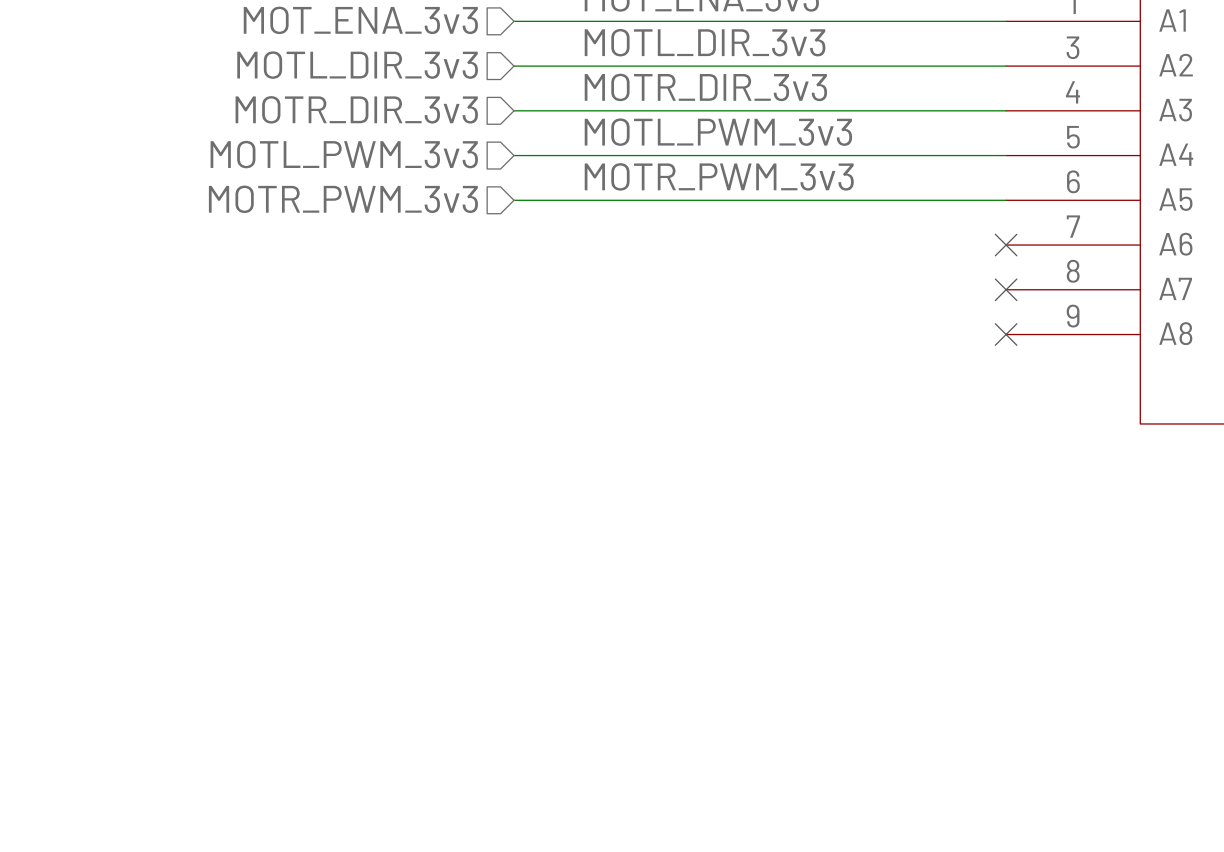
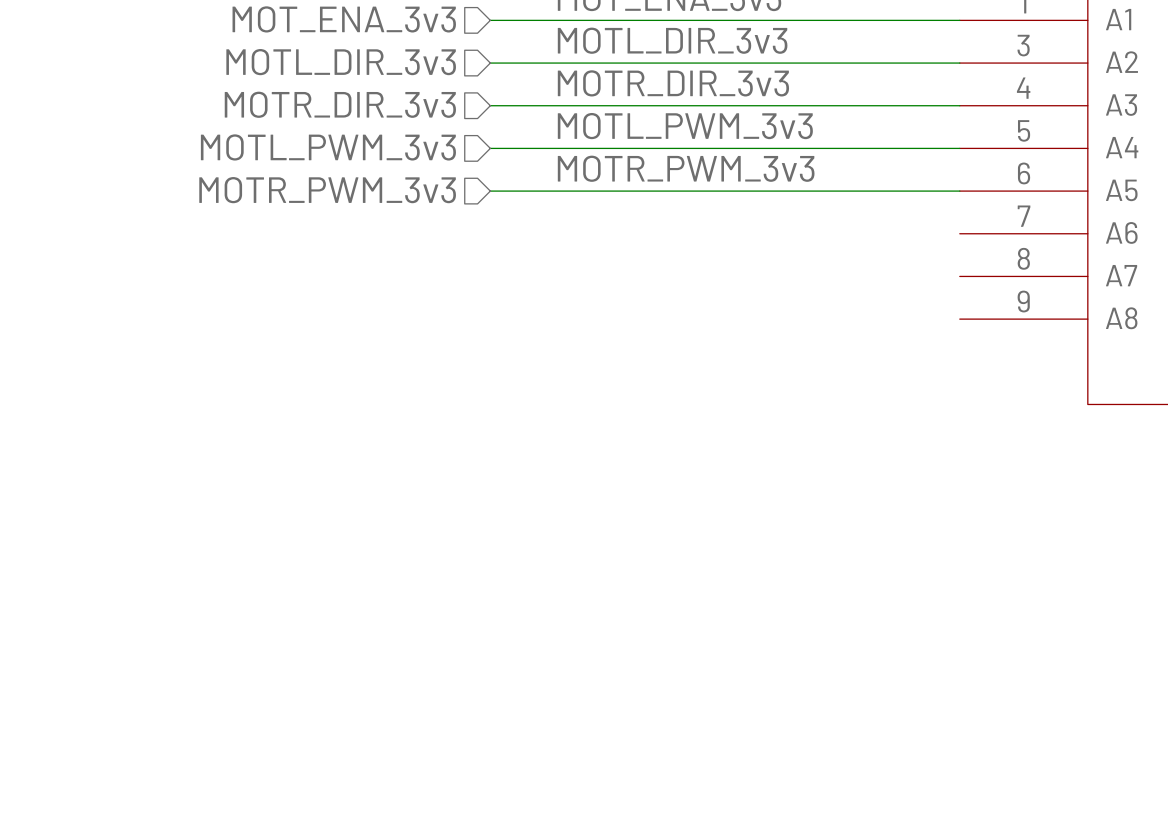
no-connect mark: (1006, 245) -> none
no-connect mark: (1006, 289) -> none
no-connect mark: (1006, 334) -> none

